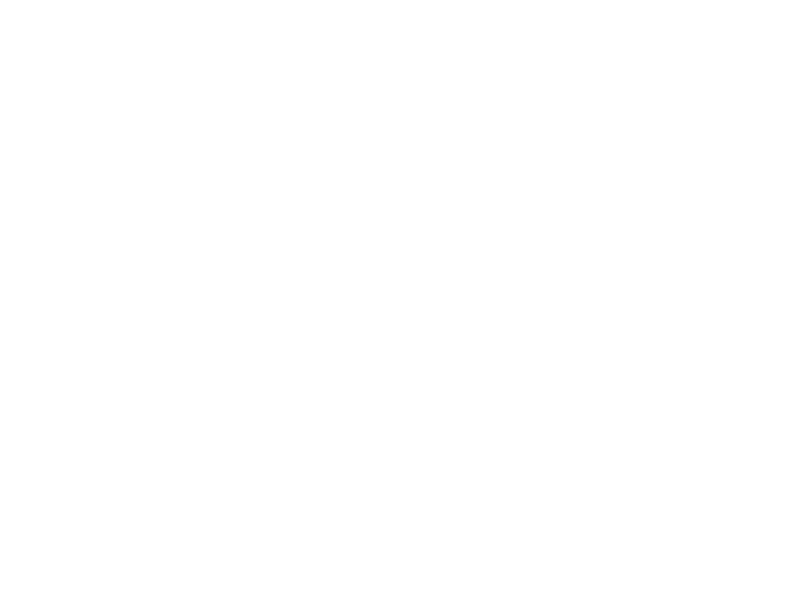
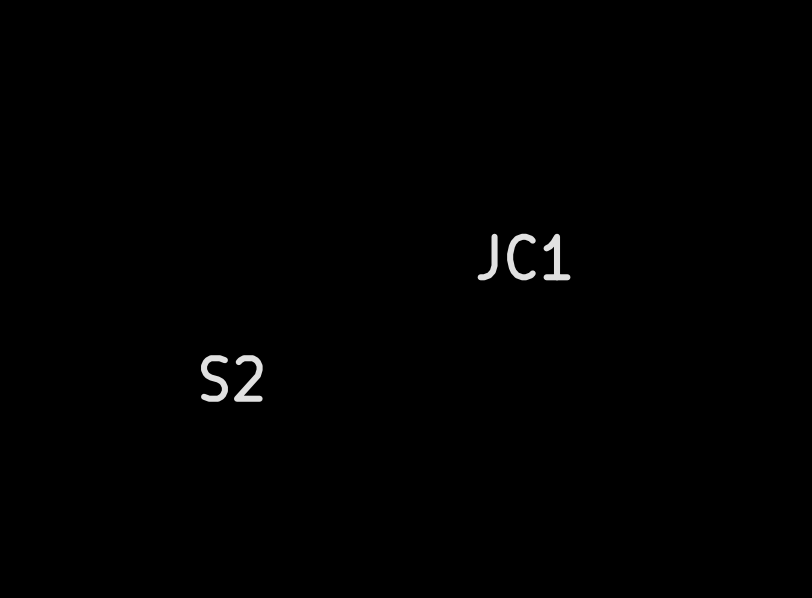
text: none -> JC1 (524, 257)
text: none -> S2 (231, 378)

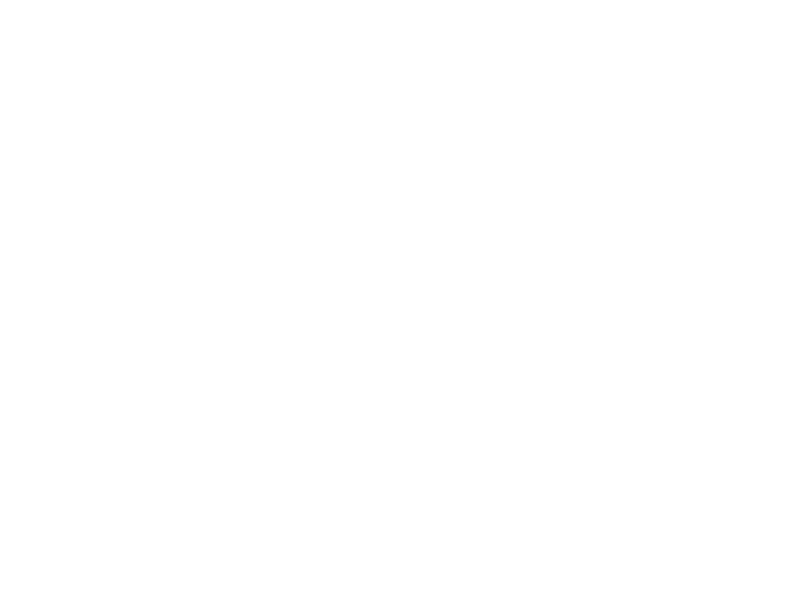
text: JC1 (524, 257) -> none
text: S2 (231, 378) -> none

